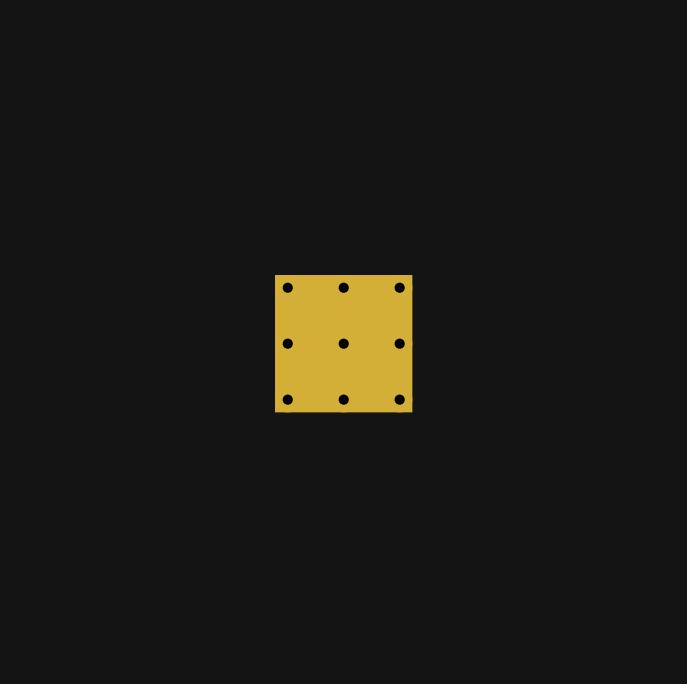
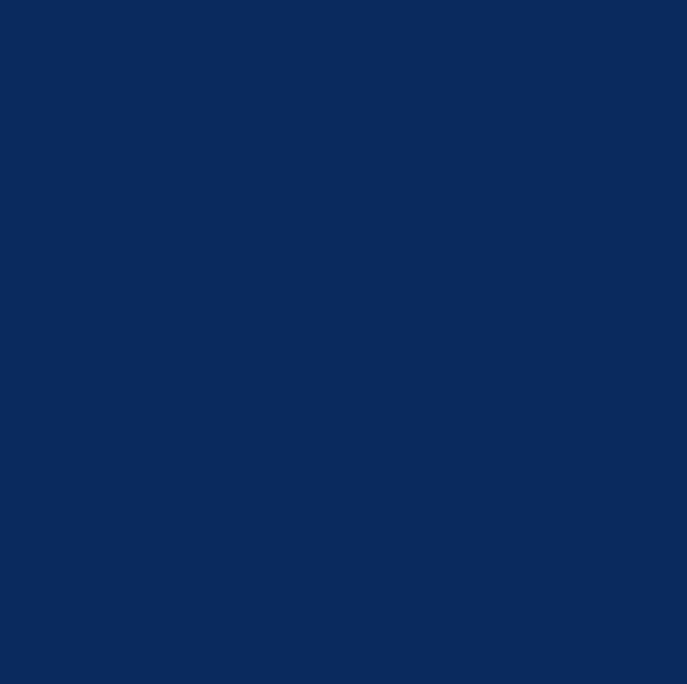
part: (343, 343) -> none

